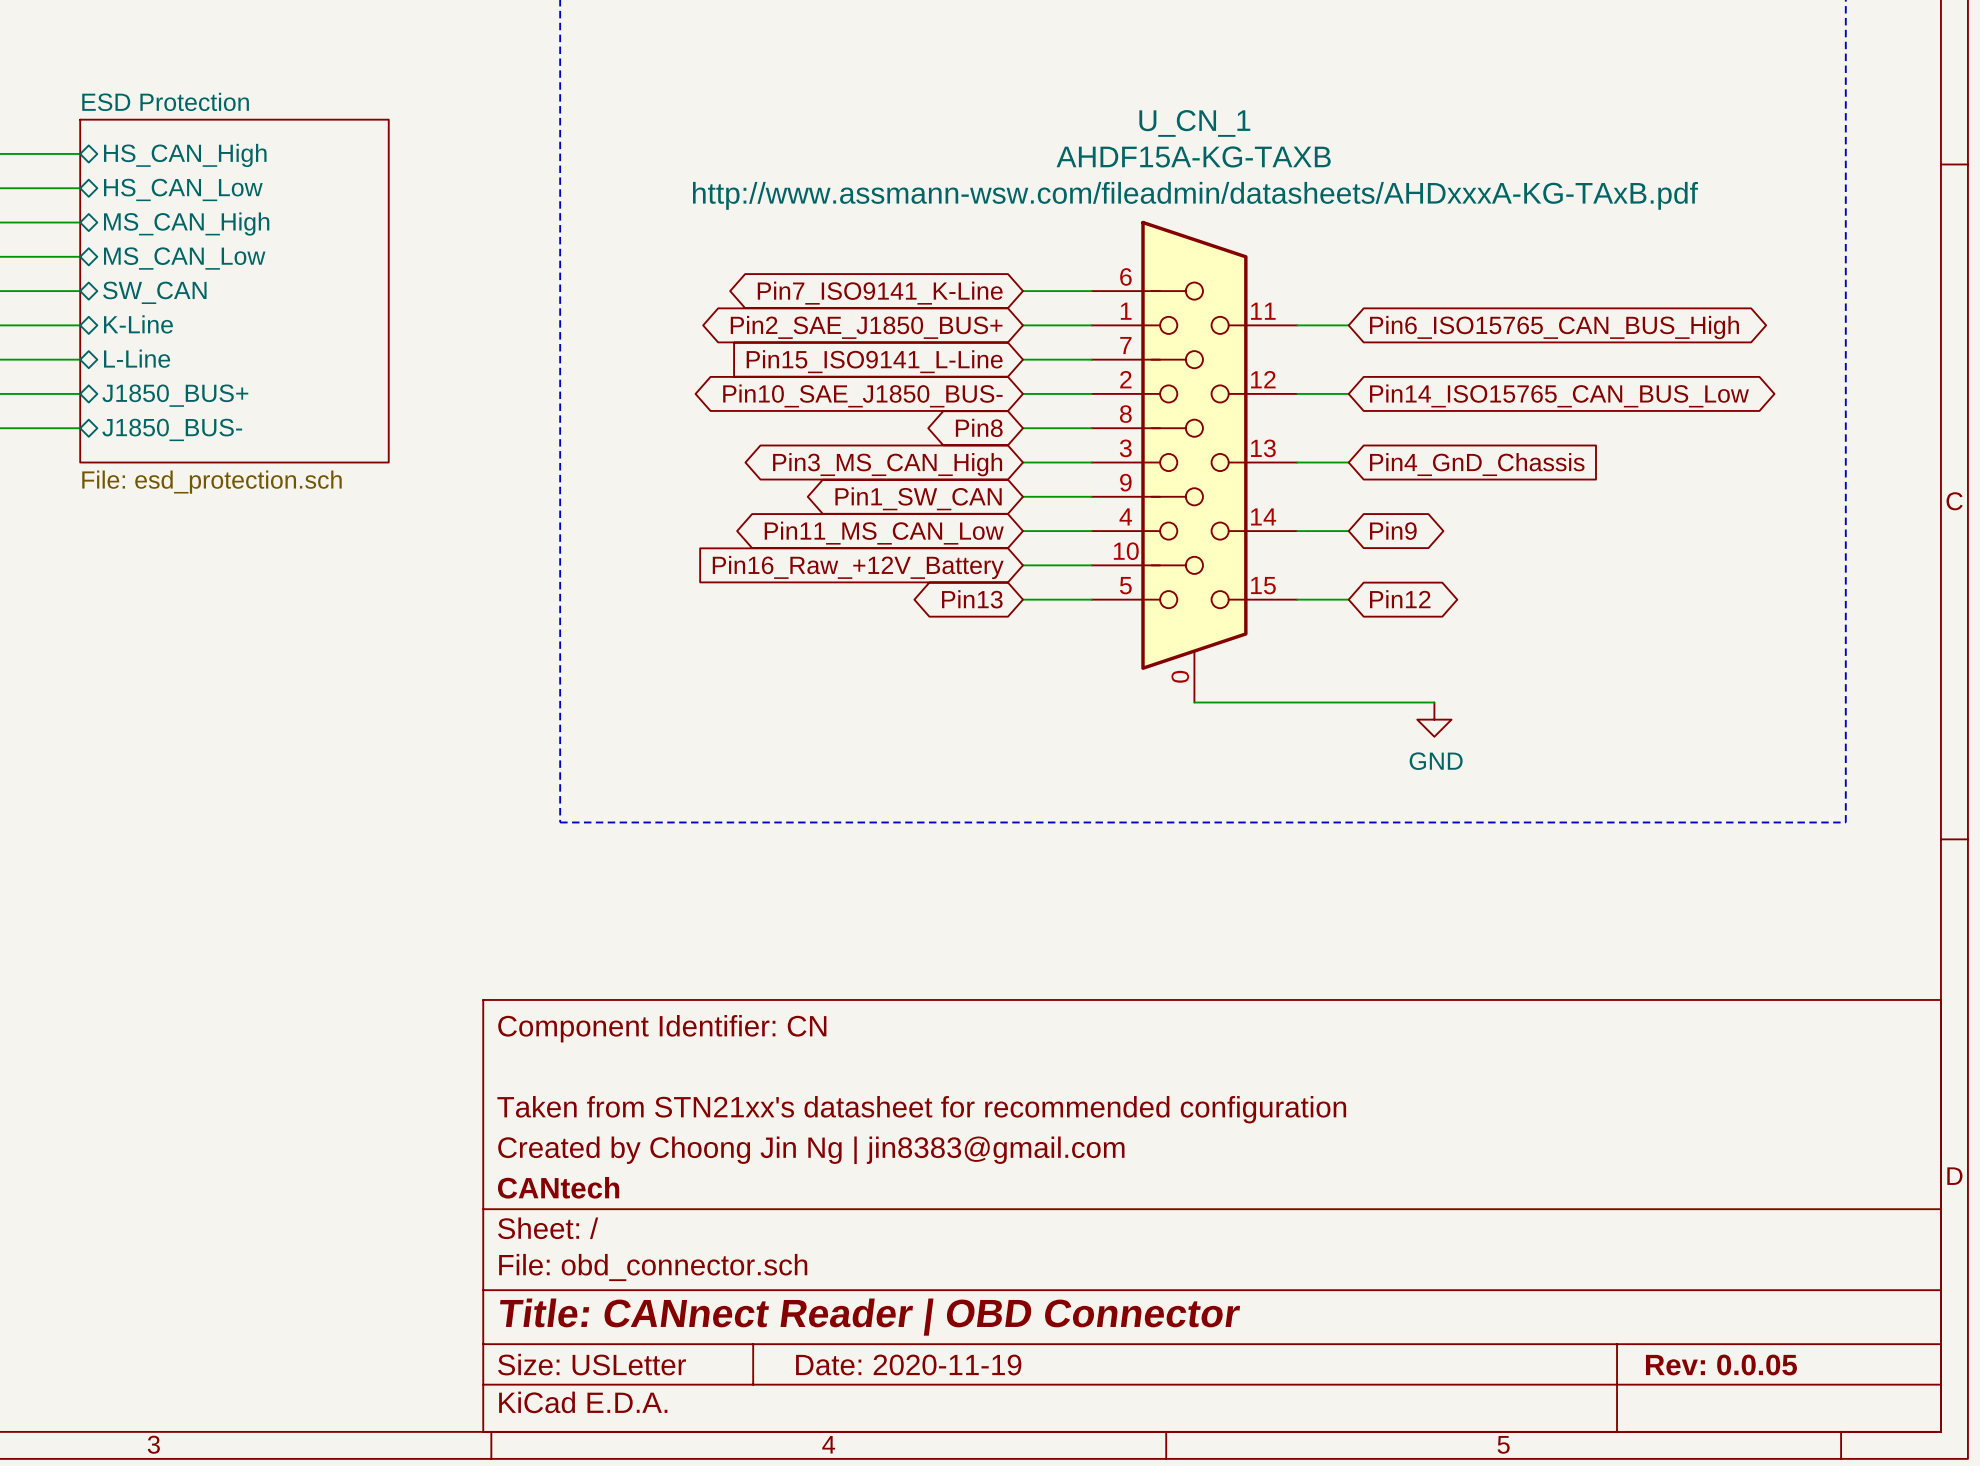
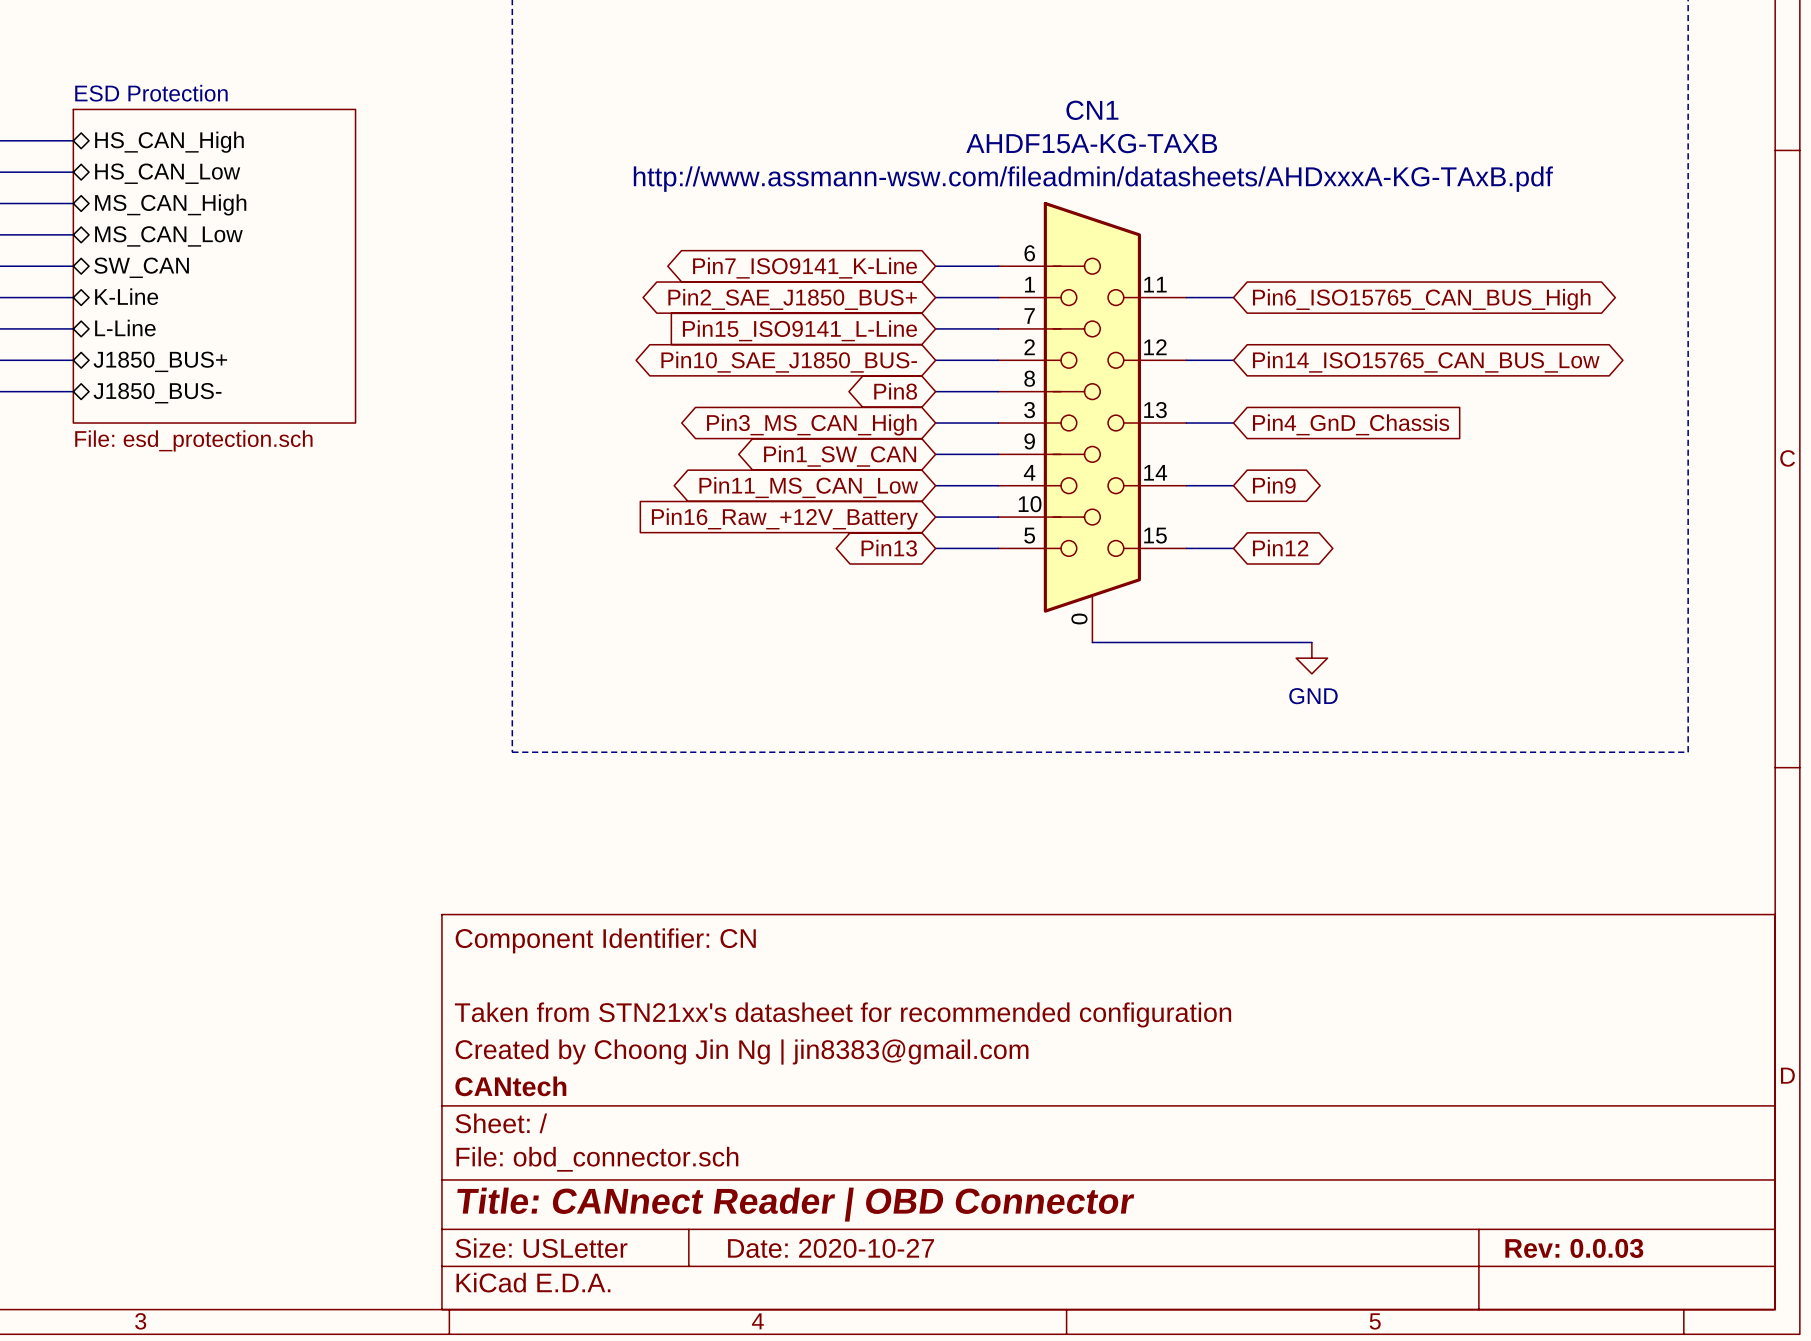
U_CN_1 name: U_CN_1 (1194, 123) -> CN1 (1092, 110)
title block: Date: 2020-11-19 (908, 1365) -> Date: 2020-10-27 (831, 1248)
title block: Rev: 0.0.05 (1721, 1365) -> Rev: 0.0.03 (1574, 1248)

